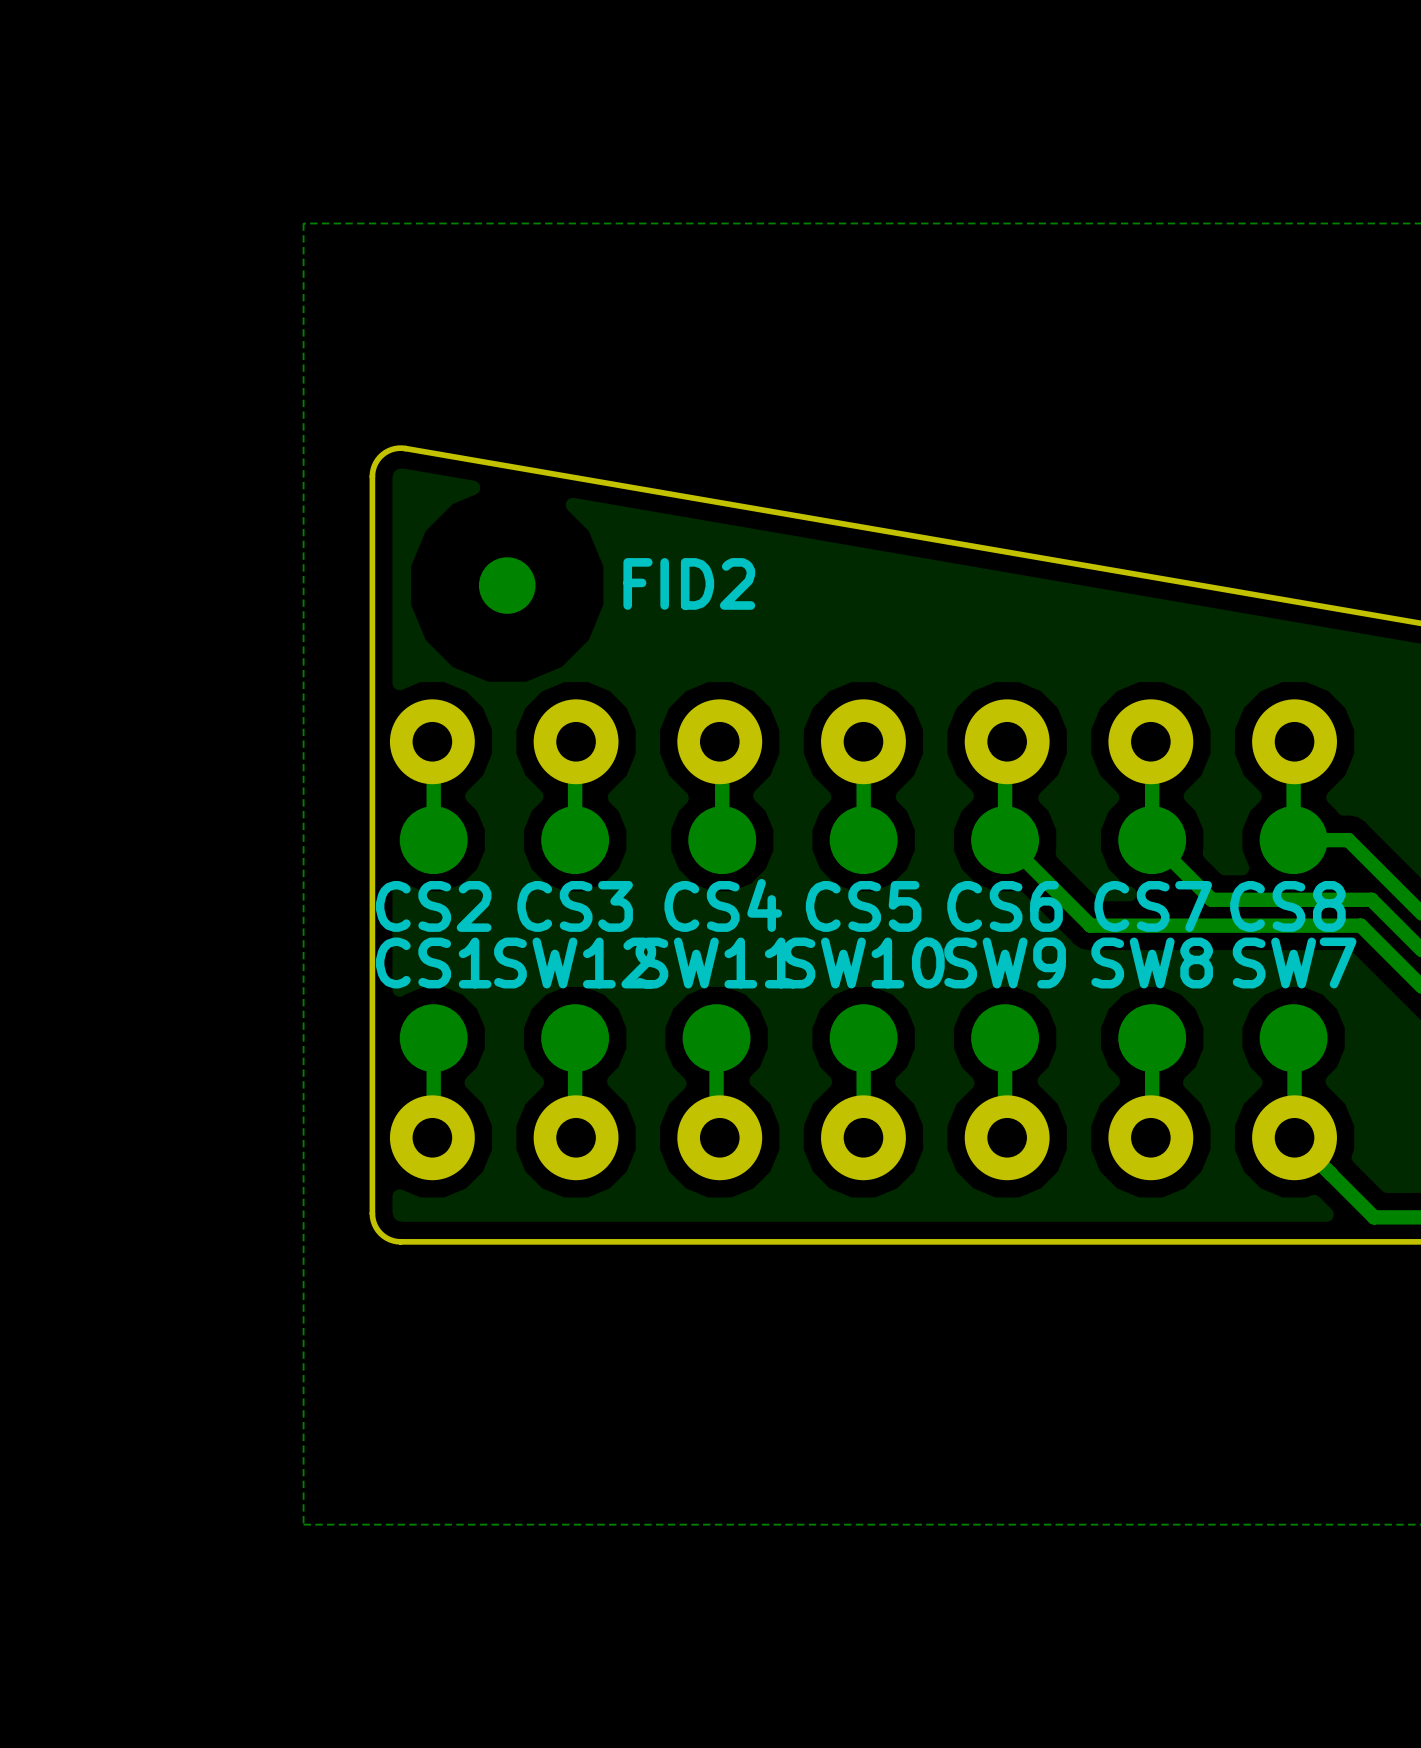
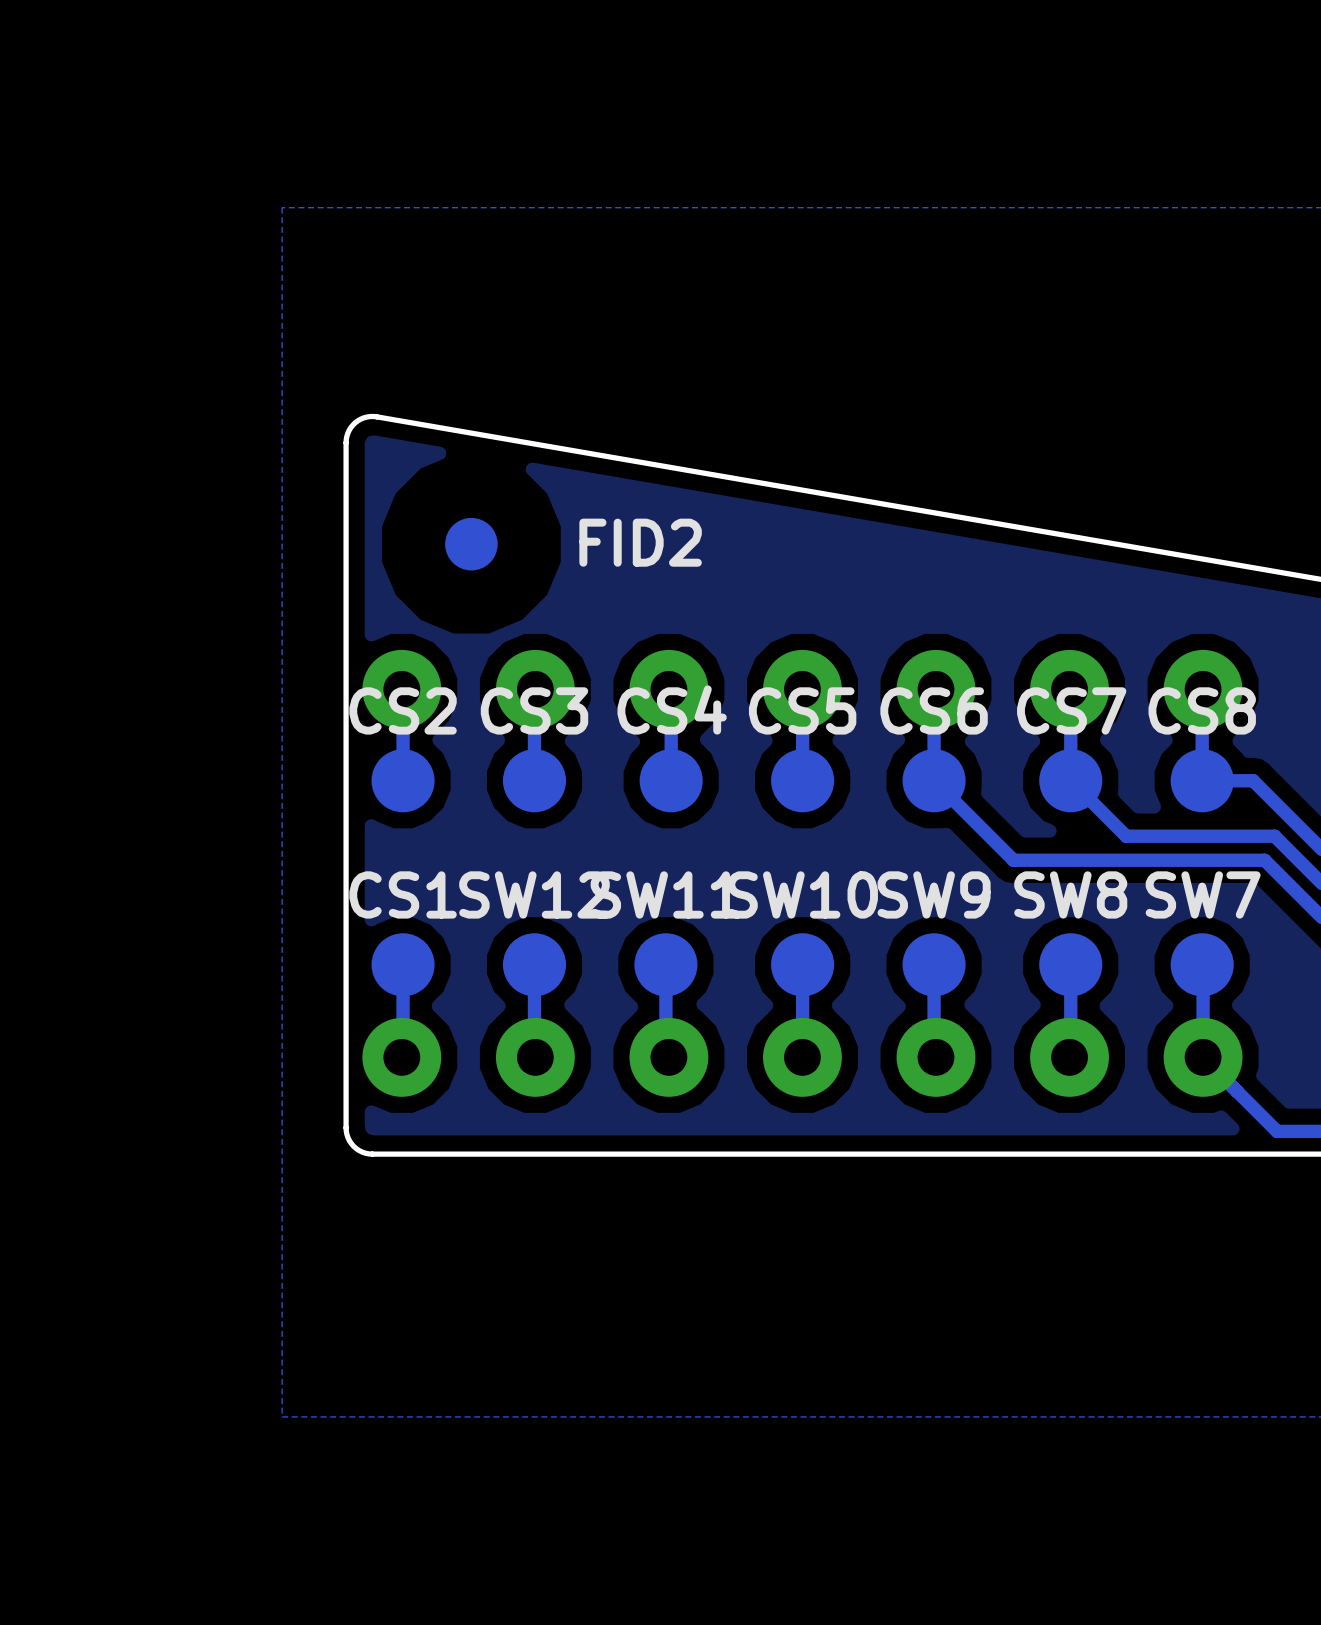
part value position: CS4 (723, 905) -> CS4 (672, 710)
part value position: CS2 (433, 906) -> CS2 (403, 710)
part value position: CS3 (575, 906) -> CS3 (534, 710)
part value position: CS5 (863, 906) -> CS5 (802, 710)
part value position: CS6 (1005, 906) -> CS6 (934, 710)
part value position: CS7 (1153, 906) -> CS7 (1071, 710)
part value position: CS8 (1287, 906) -> CS8 (1202, 710)

